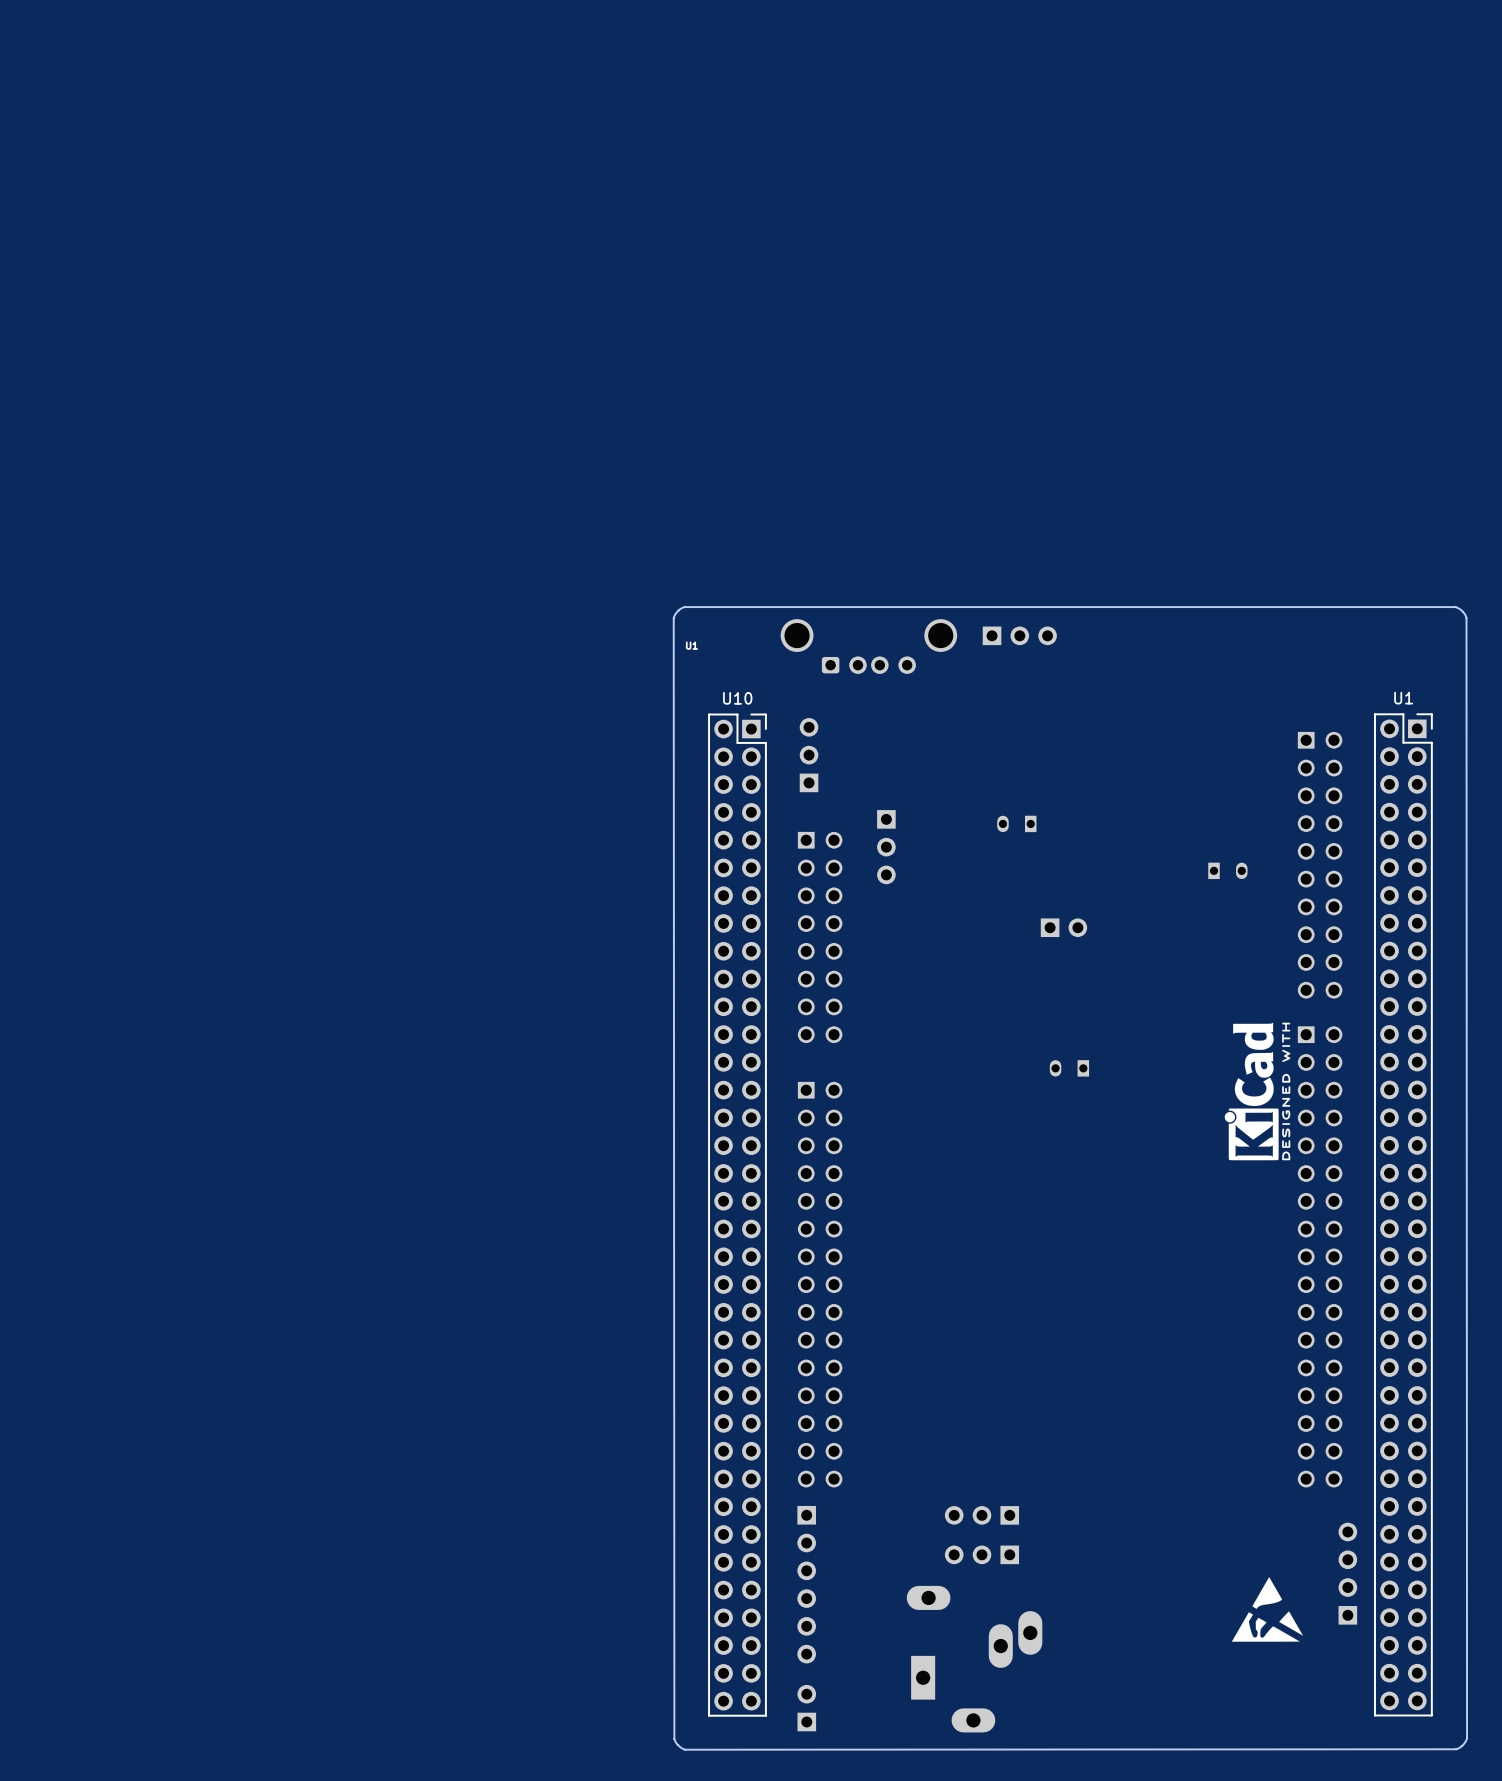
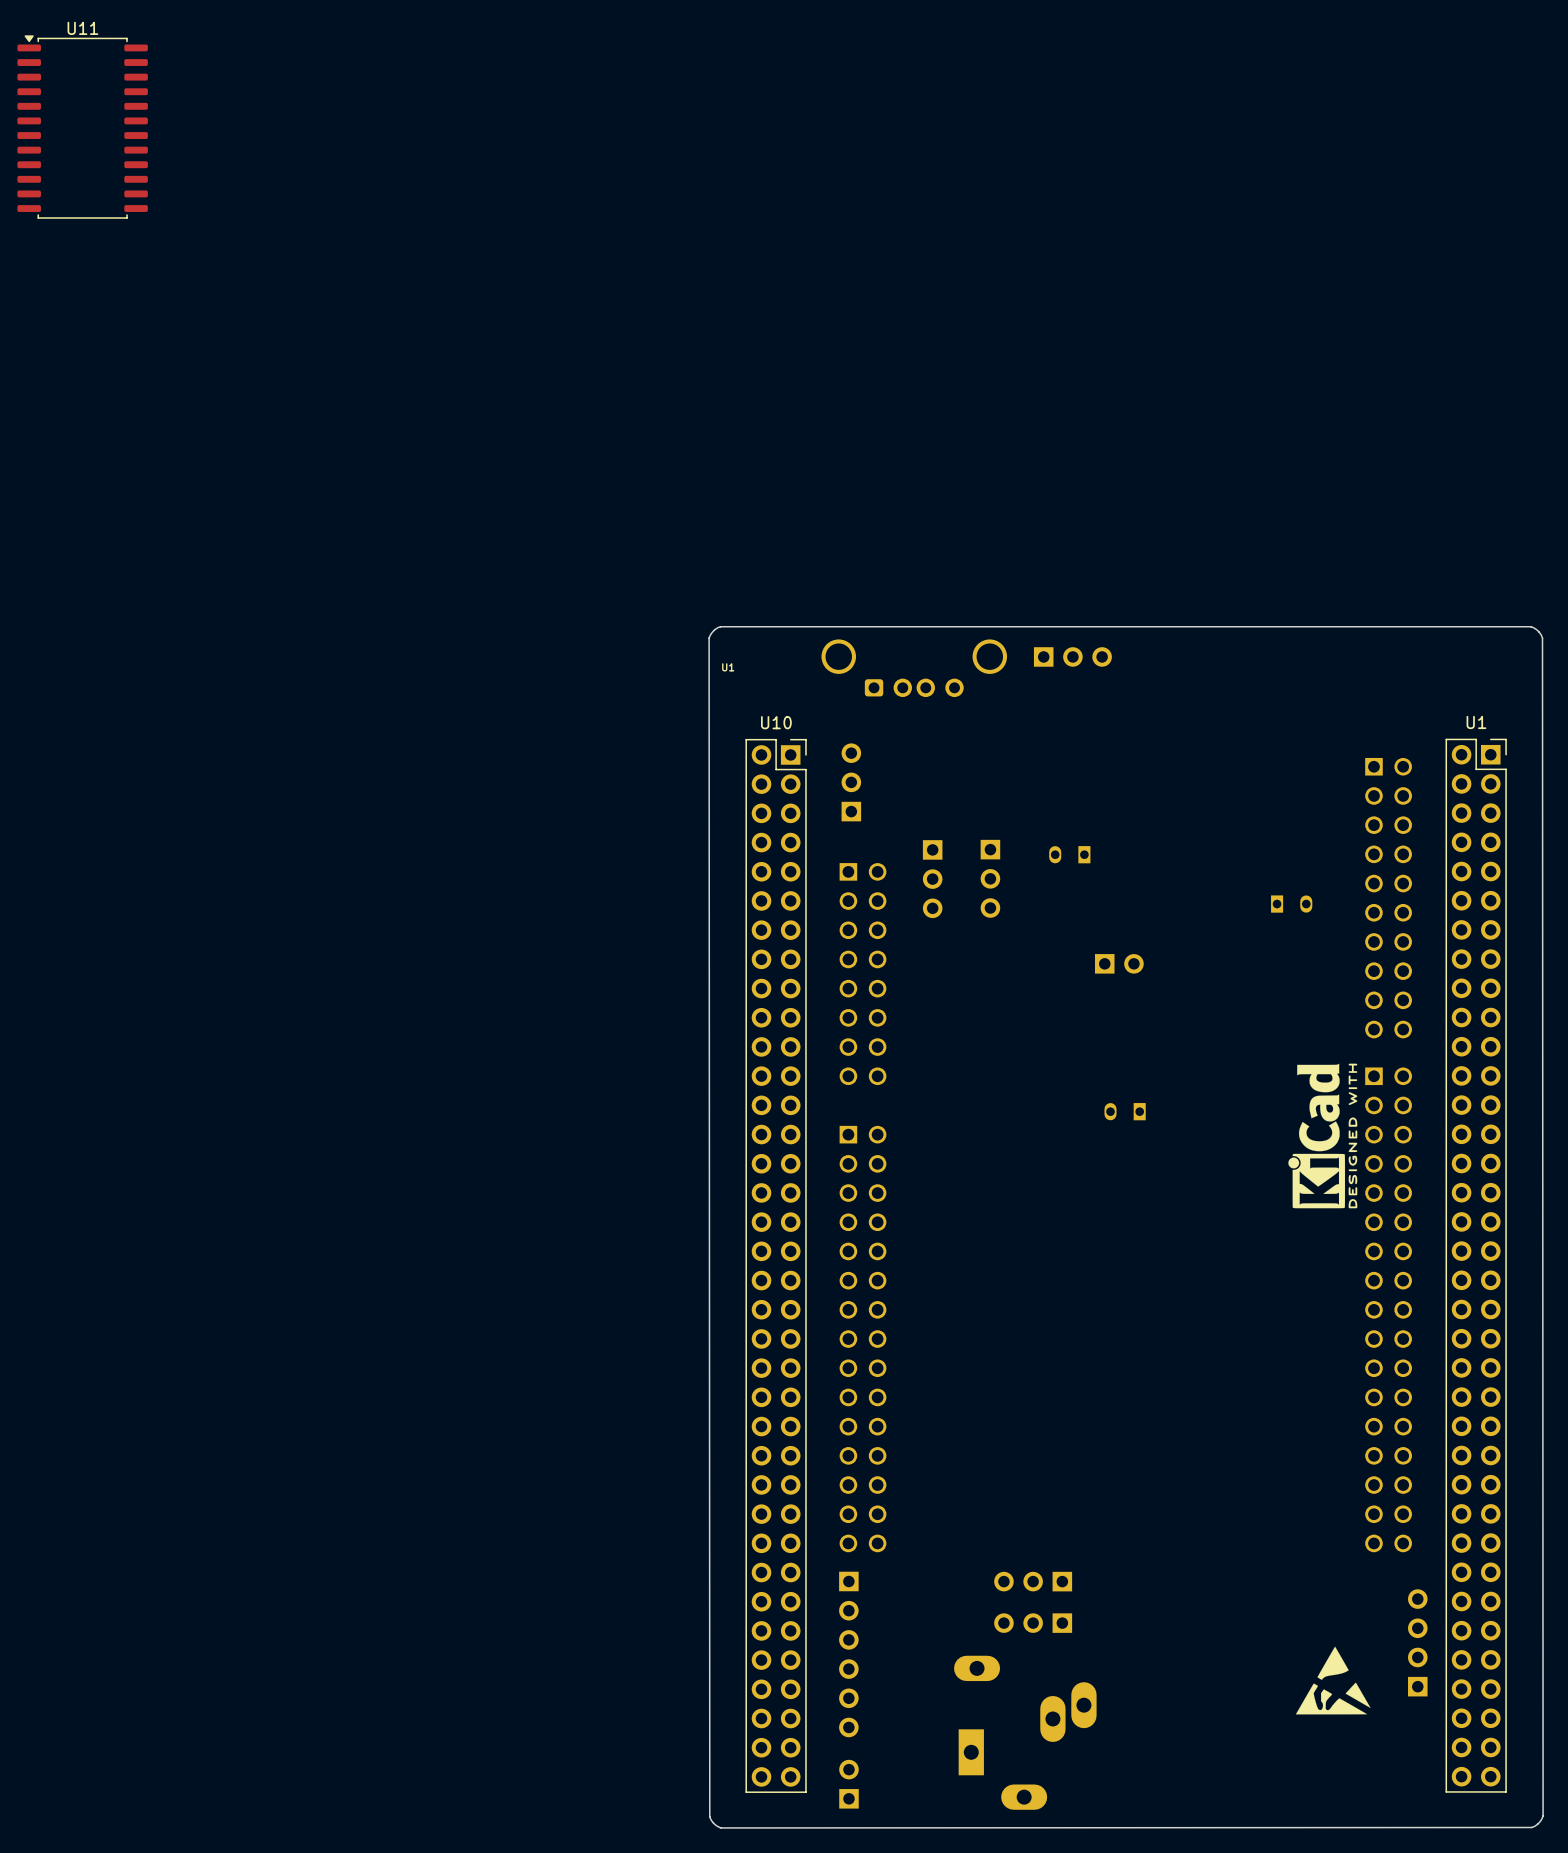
U11: none -> (82, 127)
part: none -> (990, 878)

